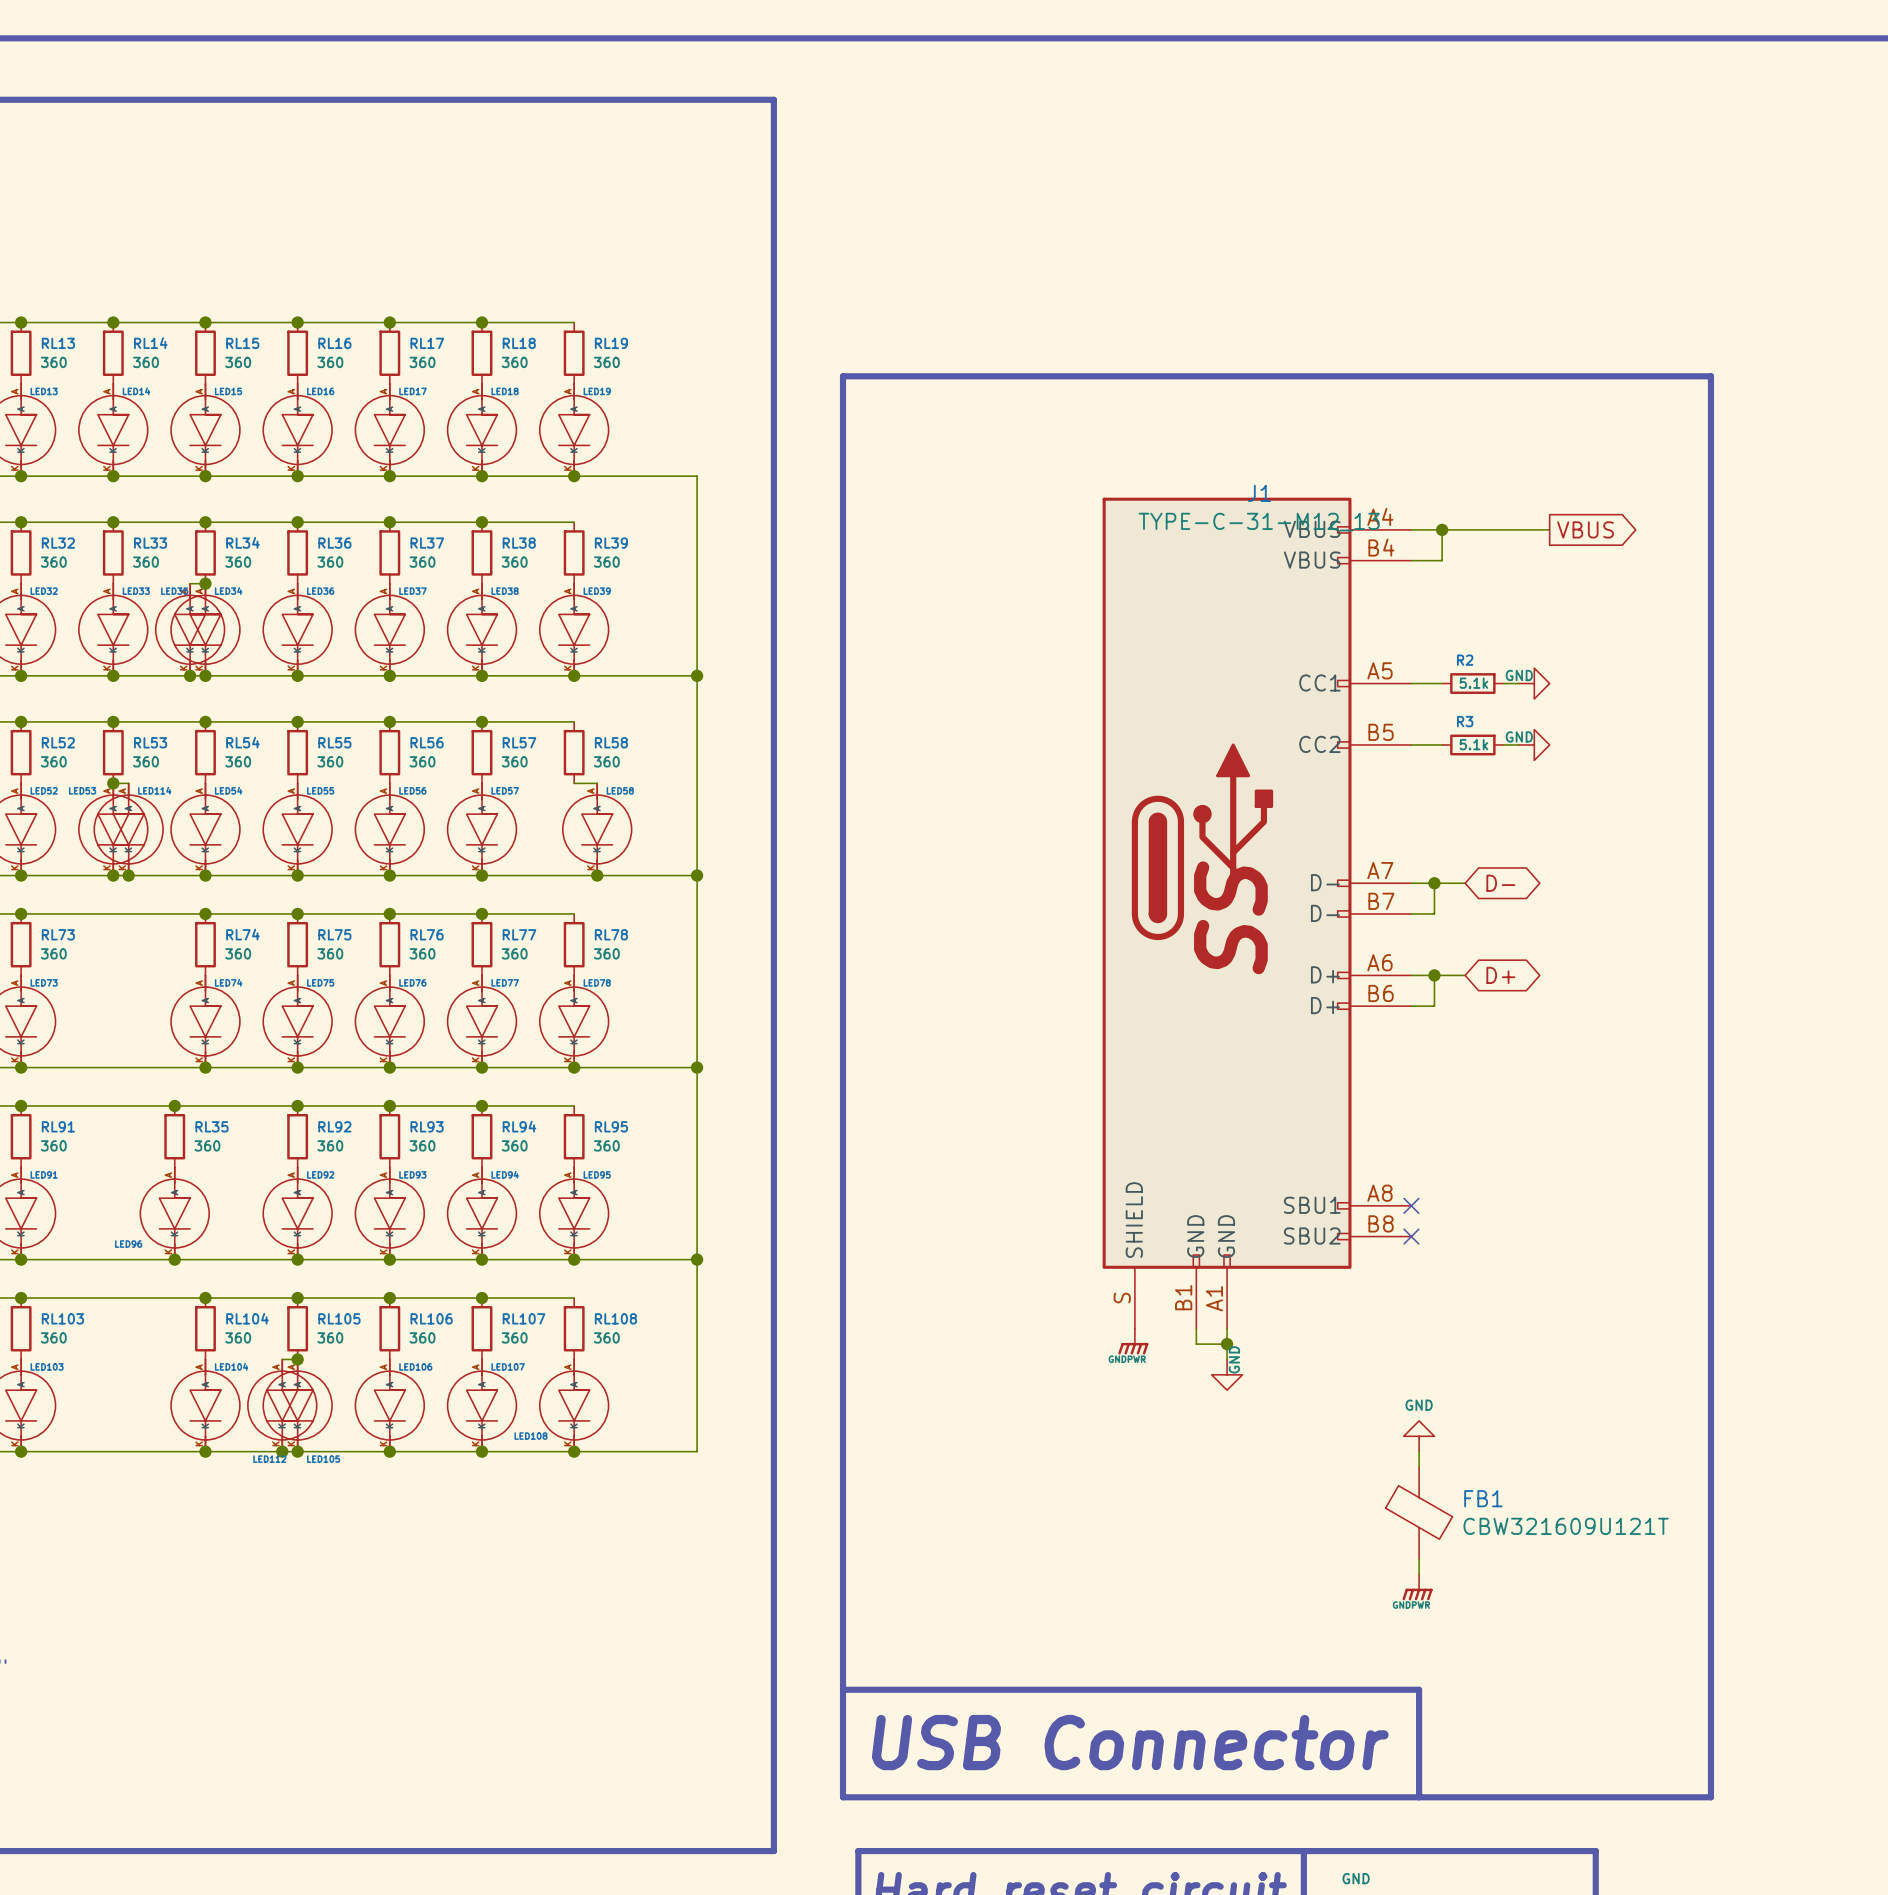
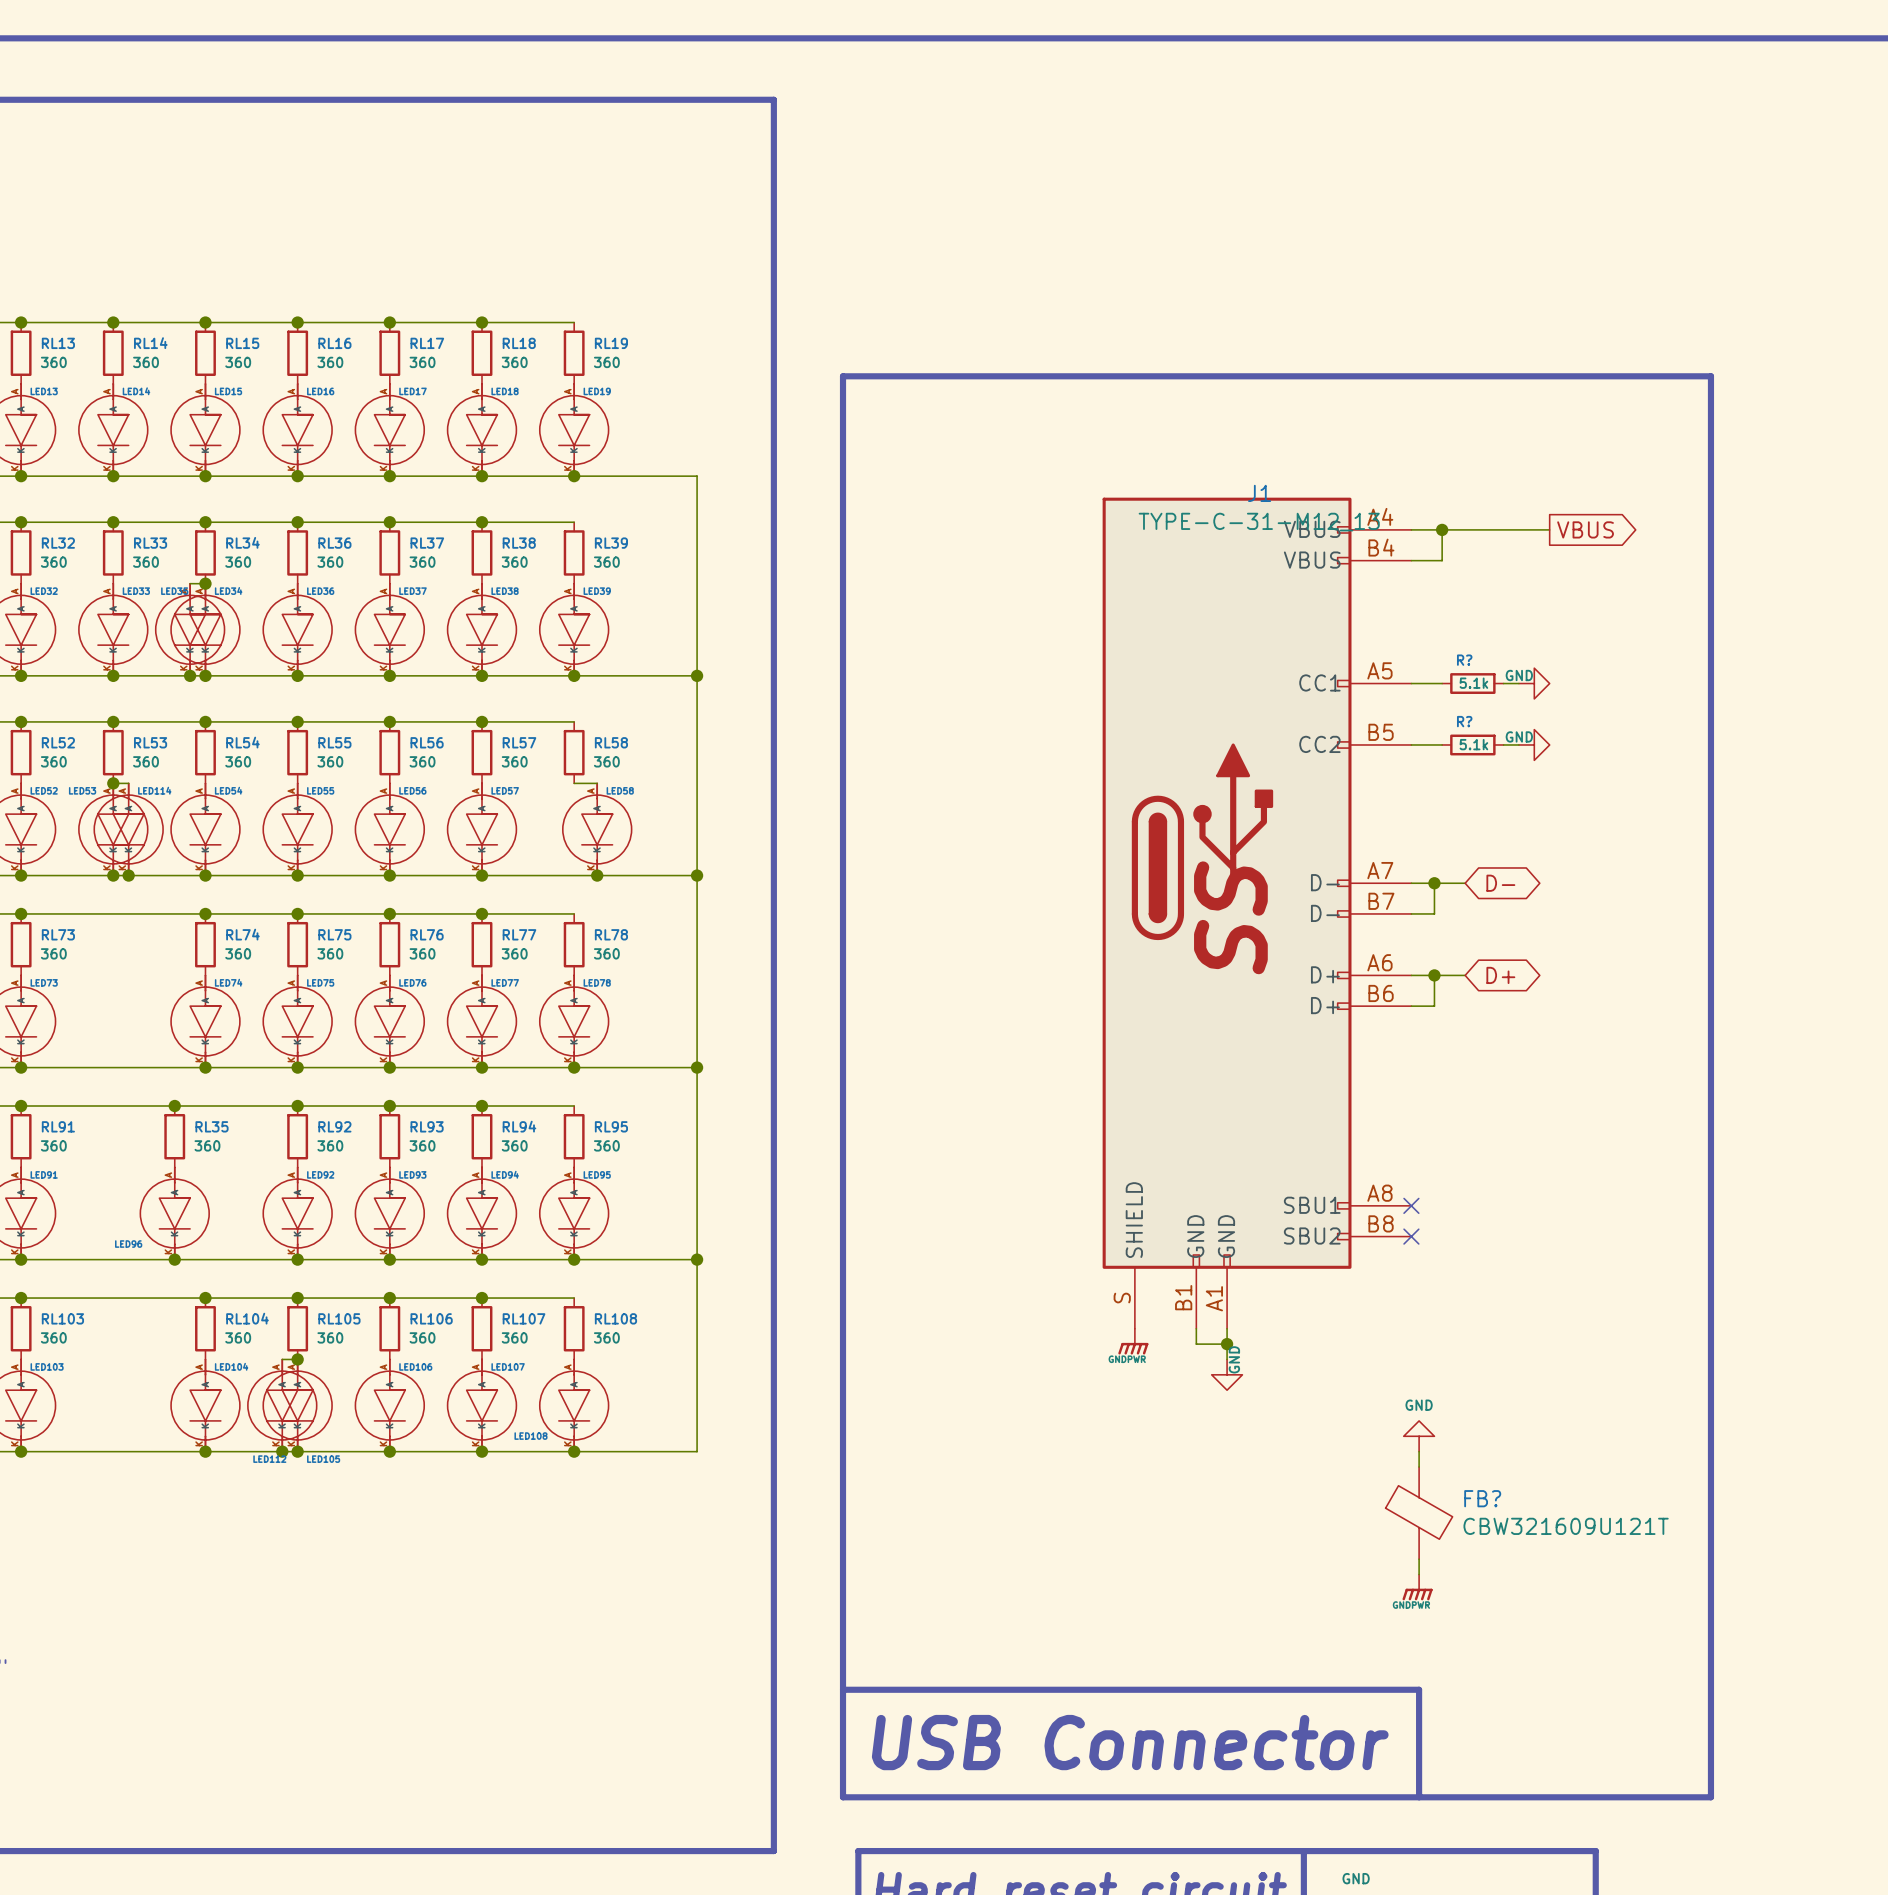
R2 name: R2 (1465, 660) -> R? (1464, 660)
R3 name: R3 (1465, 721) -> R? (1464, 721)
FB1 name: FB1 (1483, 1498) -> FB? (1482, 1498)

